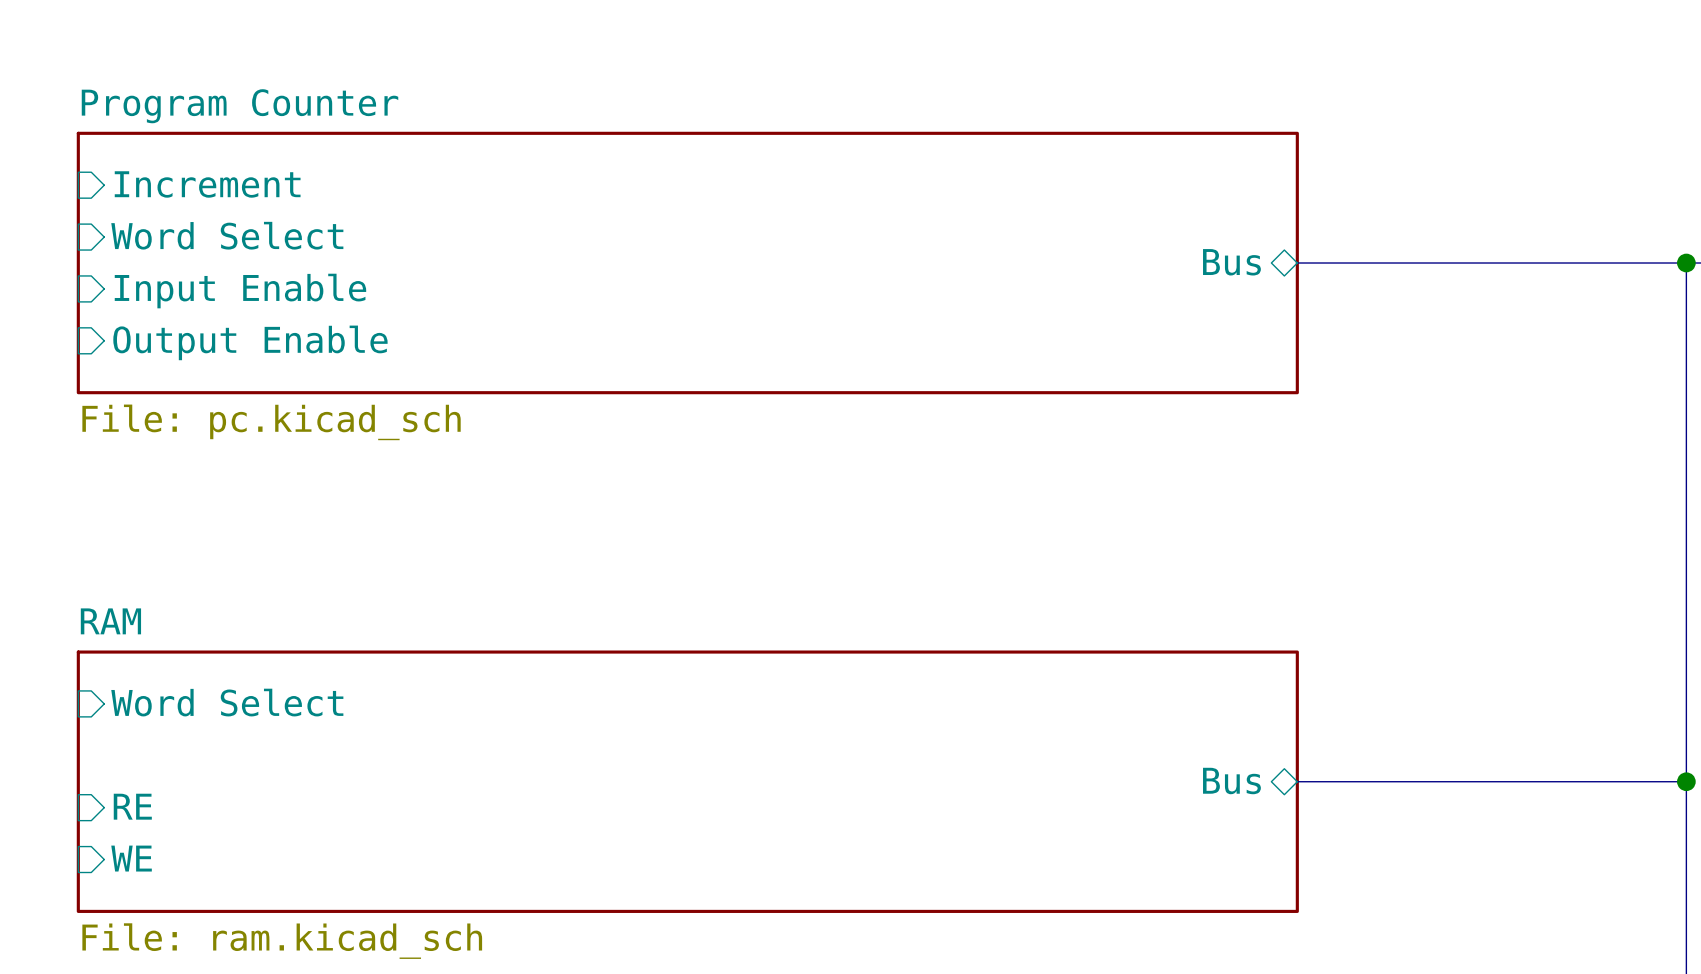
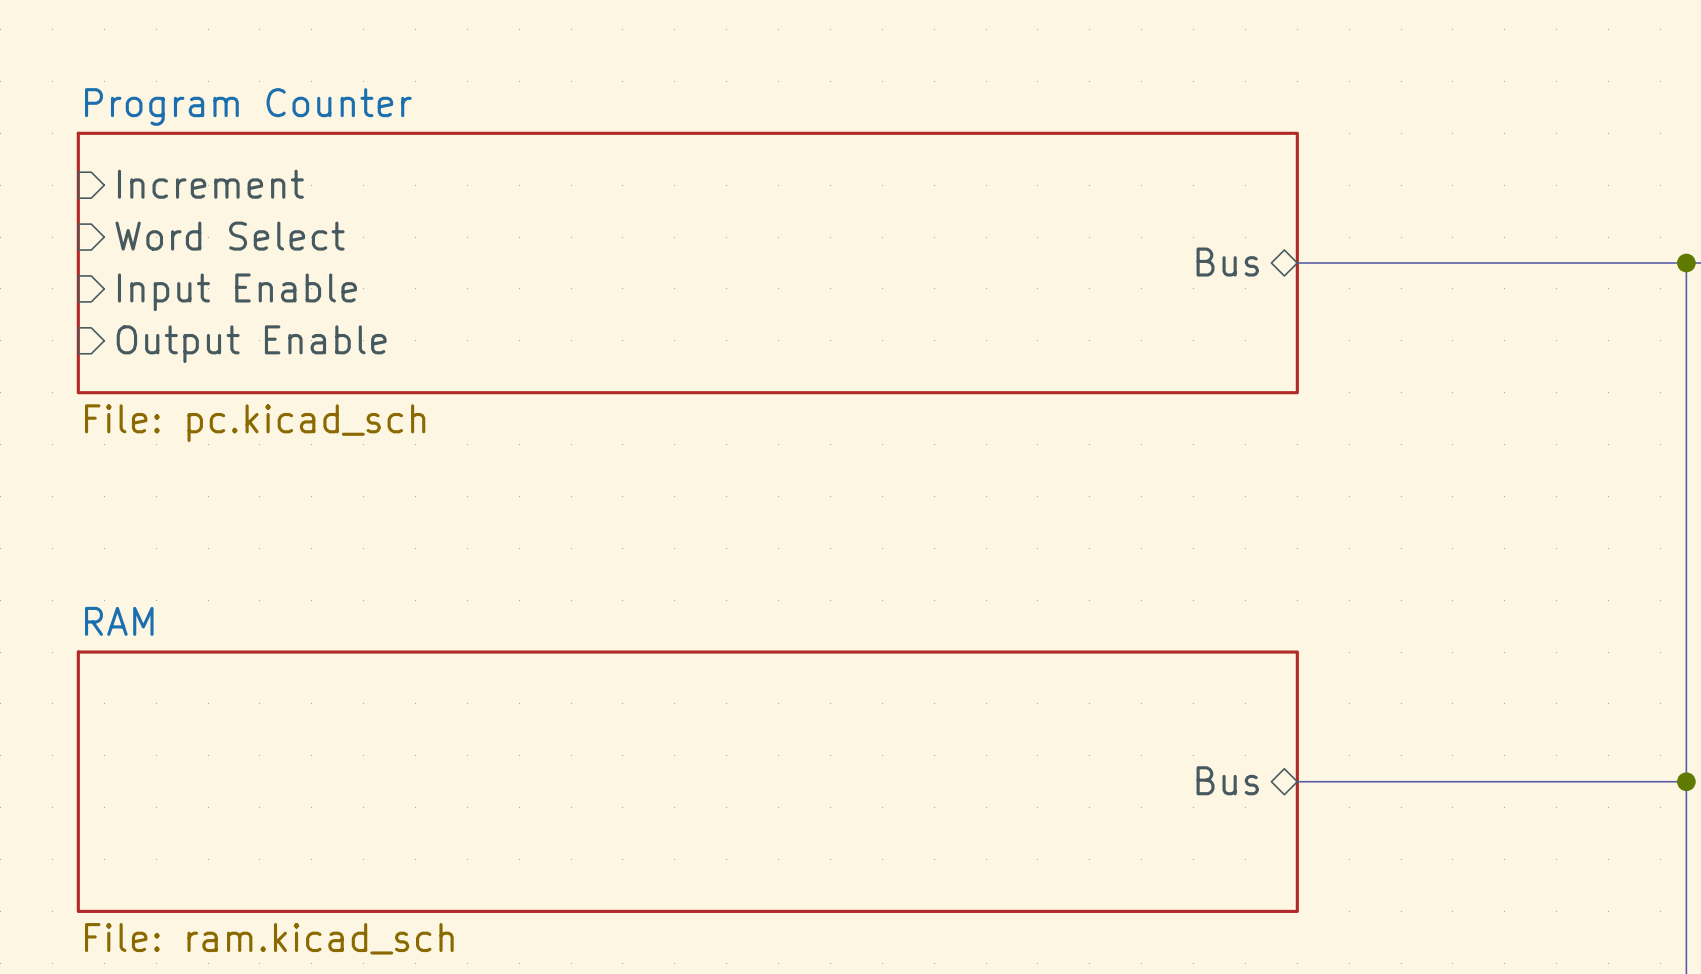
sheet pin: Word Select (227, 702) -> none
sheet pin: RE (132, 806) -> none
sheet pin: WE (131, 858) -> none

